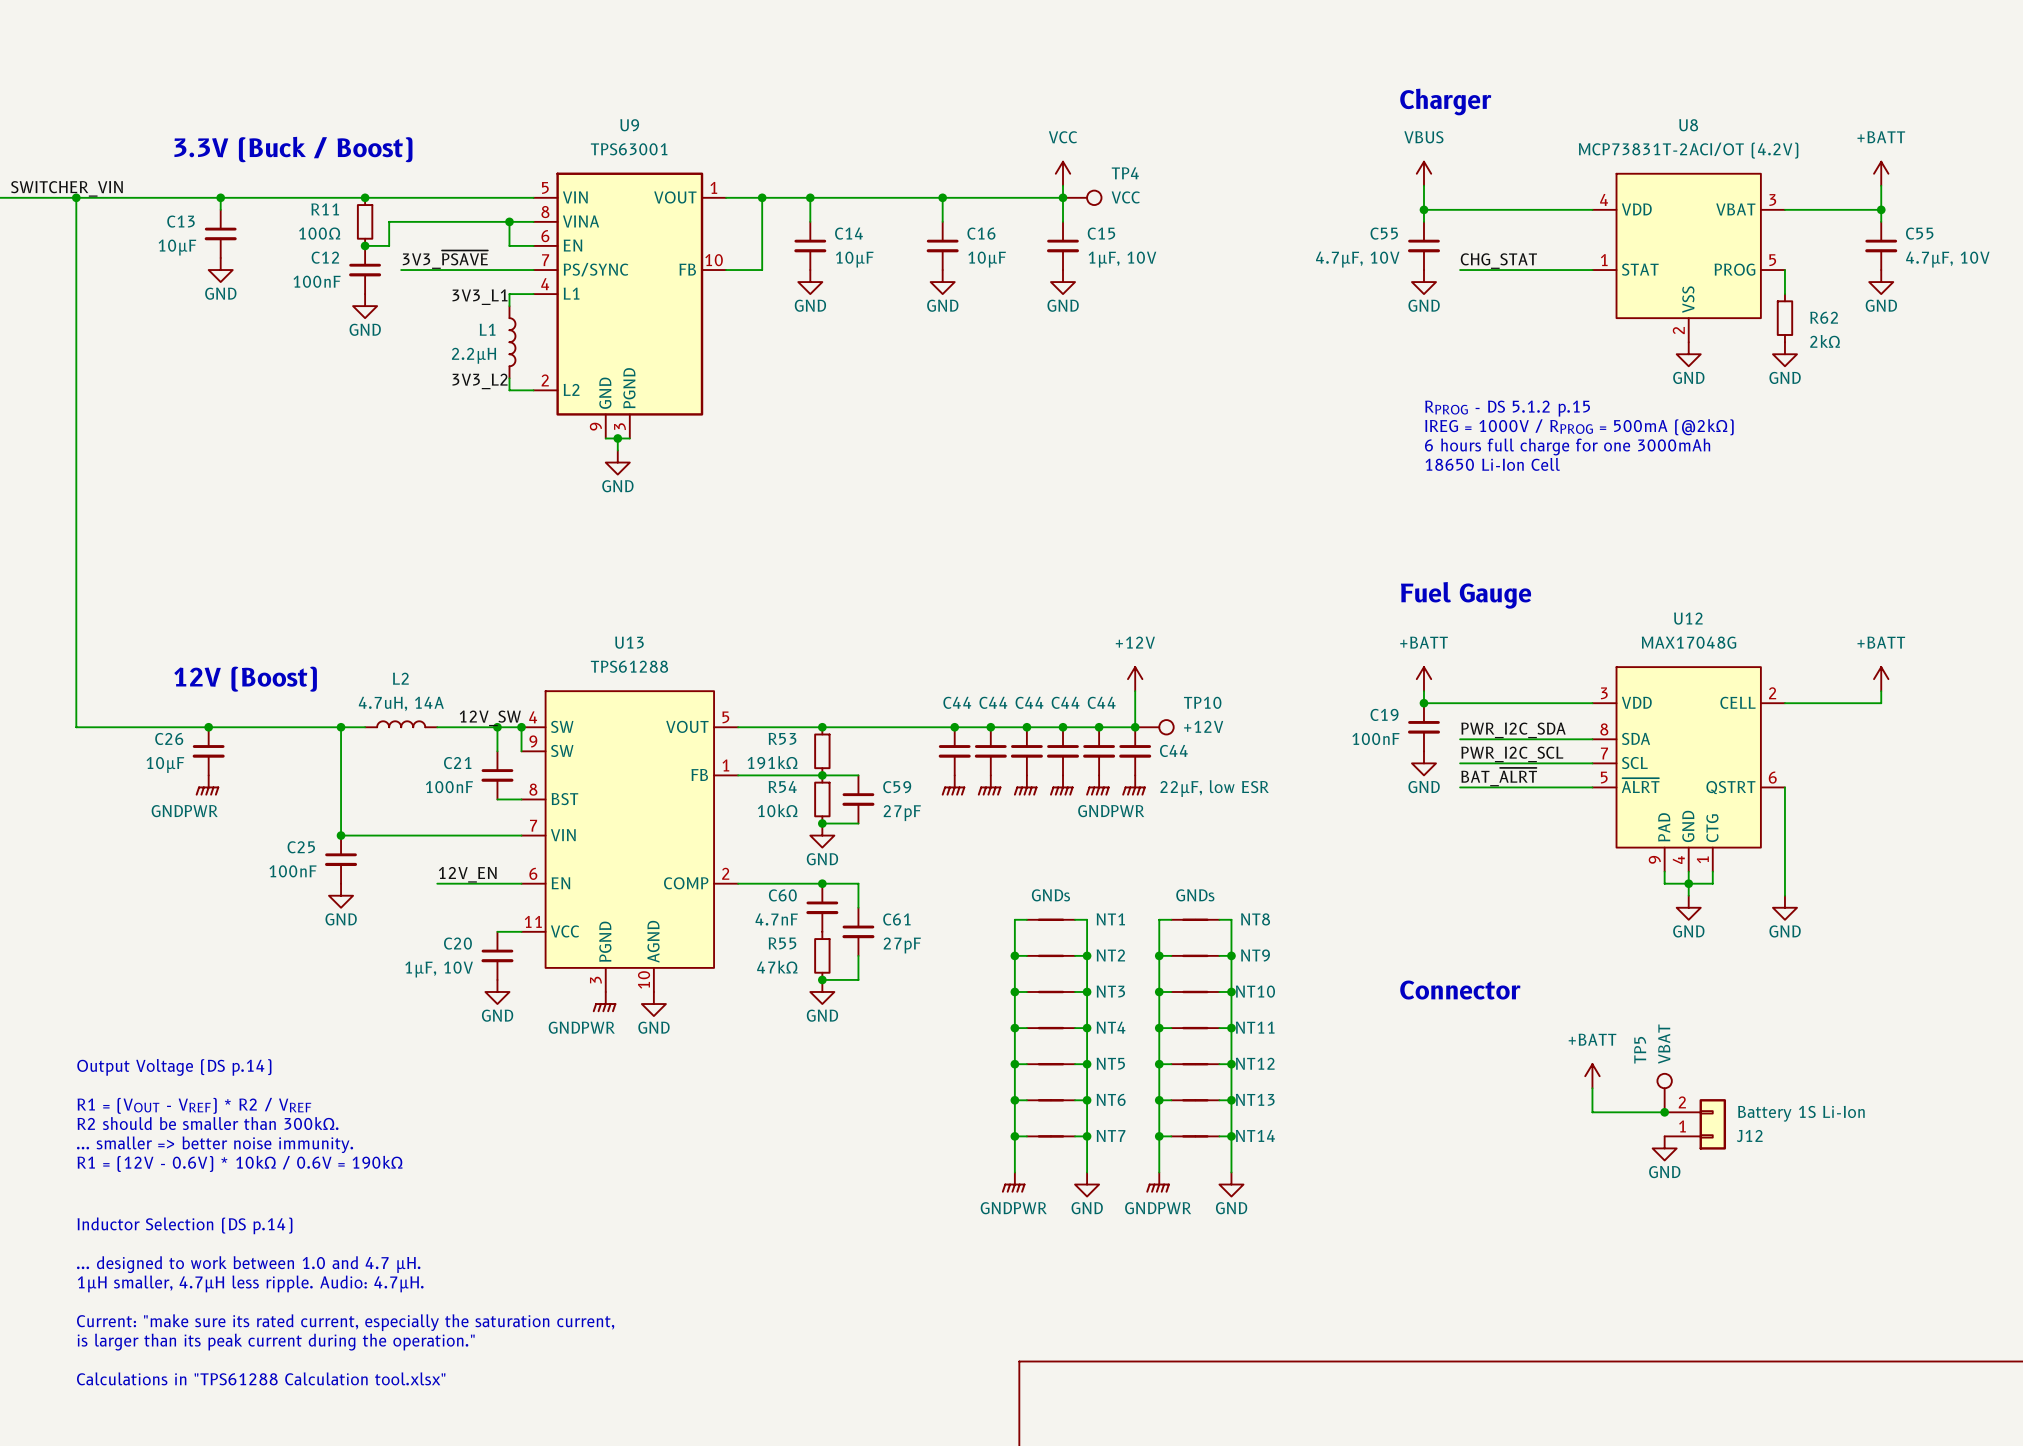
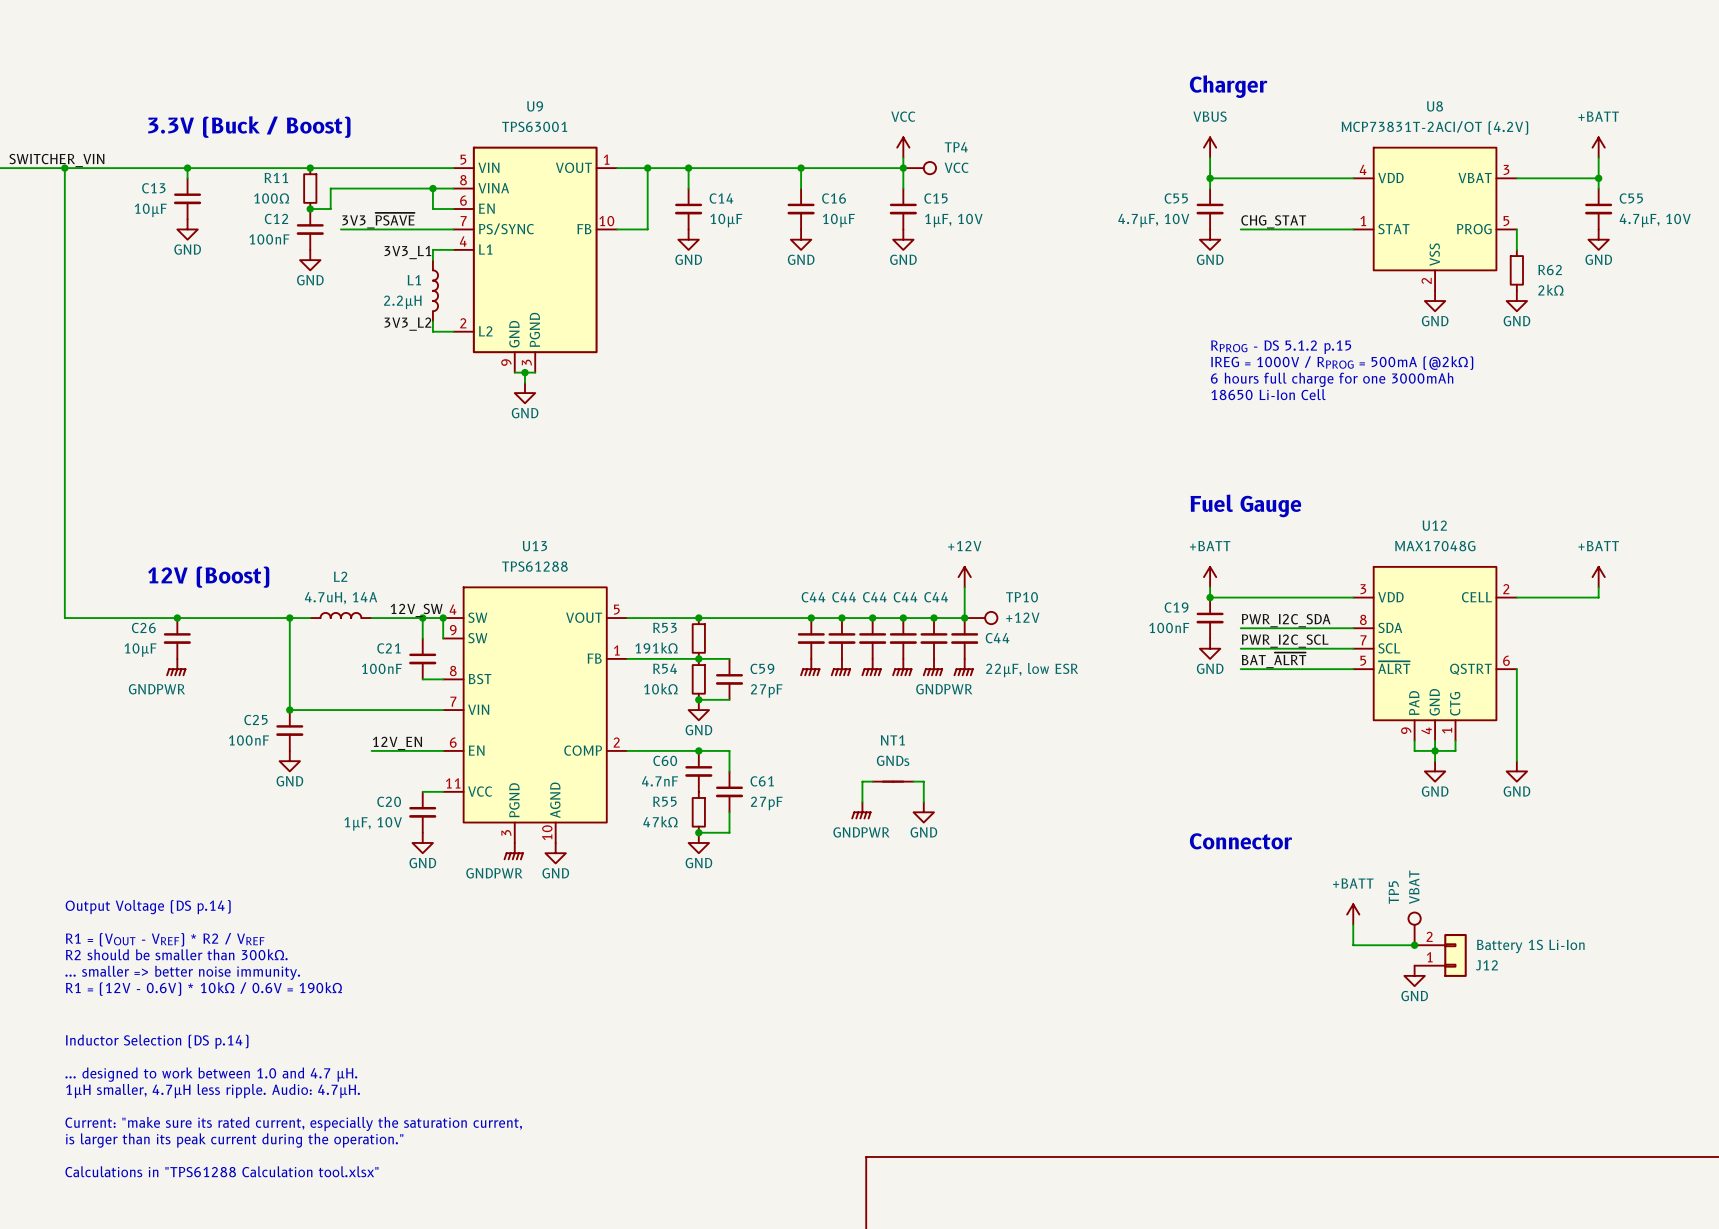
NT1 name position: NT1 (1110, 919) -> NT1 (892, 740)
wire: (1171, 919) (1159, 919) (1159, 1172) -> none
NT8: GNDs (1195, 919) -> none
wire: (1219, 919) (1231, 919) (1231, 1172) -> none
wire: (1014, 943) (1014, 1172) -> none
wire: (1087, 943) (1087, 1172) -> none
power symbol: none -> GNDPWR (861, 810)
junction: (1014, 955) -> none
NT2: (1050, 955) -> none
junction: (1087, 955) -> none
power symbol: none -> GND (923, 812)
wire: (1159, 955) (1171, 955) -> none
junction: (1159, 955) -> none
NT9: (1195, 955) -> none
wire: (1219, 955) (1231, 955) -> none
junction: (1231, 955) -> none
wire: (1014, 991) (1026, 991) -> none
junction: (1014, 991) -> none
NT3: (1050, 991) -> none
wire: (1075, 991) (1087, 991) -> none
junction: (1087, 991) -> none
wire: (1159, 991) (1171, 991) -> none
junction: (1159, 991) -> none
NT10: (1195, 991) -> none
wire: (1219, 991) (1231, 991) -> none
junction: (1231, 991) -> none
wire: (1014, 1028) (1026, 1028) -> none
junction: (1014, 1028) -> none
NT4: (1050, 1028) -> none
wire: (1075, 1028) (1087, 1028) -> none
junction: (1087, 1028) -> none
wire: (1159, 1028) (1171, 1028) -> none
junction: (1159, 1028) -> none
NT11: (1195, 1028) -> none
wire: (1219, 1028) (1231, 1028) -> none
junction: (1231, 1028) -> none
wire: (1014, 1064) (1026, 1064) -> none
junction: (1014, 1064) -> none
NT5: (1050, 1064) -> none
wire: (1075, 1064) (1087, 1064) -> none
junction: (1087, 1064) -> none
wire: (1159, 1064) (1171, 1064) -> none
junction: (1159, 1064) -> none
NT12: (1195, 1064) -> none
wire: (1219, 1064) (1231, 1064) -> none
junction: (1231, 1064) -> none
wire: (1014, 1100) (1026, 1100) -> none
junction: (1014, 1100) -> none
NT6: (1050, 1100) -> none
wire: (1075, 1100) (1087, 1100) -> none
junction: (1087, 1100) -> none
wire: (1159, 1100) (1171, 1100) -> none
junction: (1159, 1100) -> none
NT13: (1195, 1100) -> none
wire: (1219, 1100) (1231, 1100) -> none
junction: (1231, 1100) -> none
wire: (1014, 1136) (1026, 1136) -> none
junction: (1014, 1136) -> none
NT7: (1050, 1136) -> none
wire: (1075, 1136) (1087, 1136) -> none
junction: (1087, 1136) -> none
wire: (1159, 1136) (1171, 1136) -> none
junction: (1159, 1136) -> none
NT14: (1195, 1136) -> none
wire: (1219, 1136) (1231, 1136) -> none
junction: (1231, 1136) -> none
power symbol: GNDPWR (1013, 1182) -> none
power symbol: GNDPWR (1158, 1182) -> none
power symbol: GND (1087, 1184) -> none
power symbol: GND (1231, 1184) -> none

